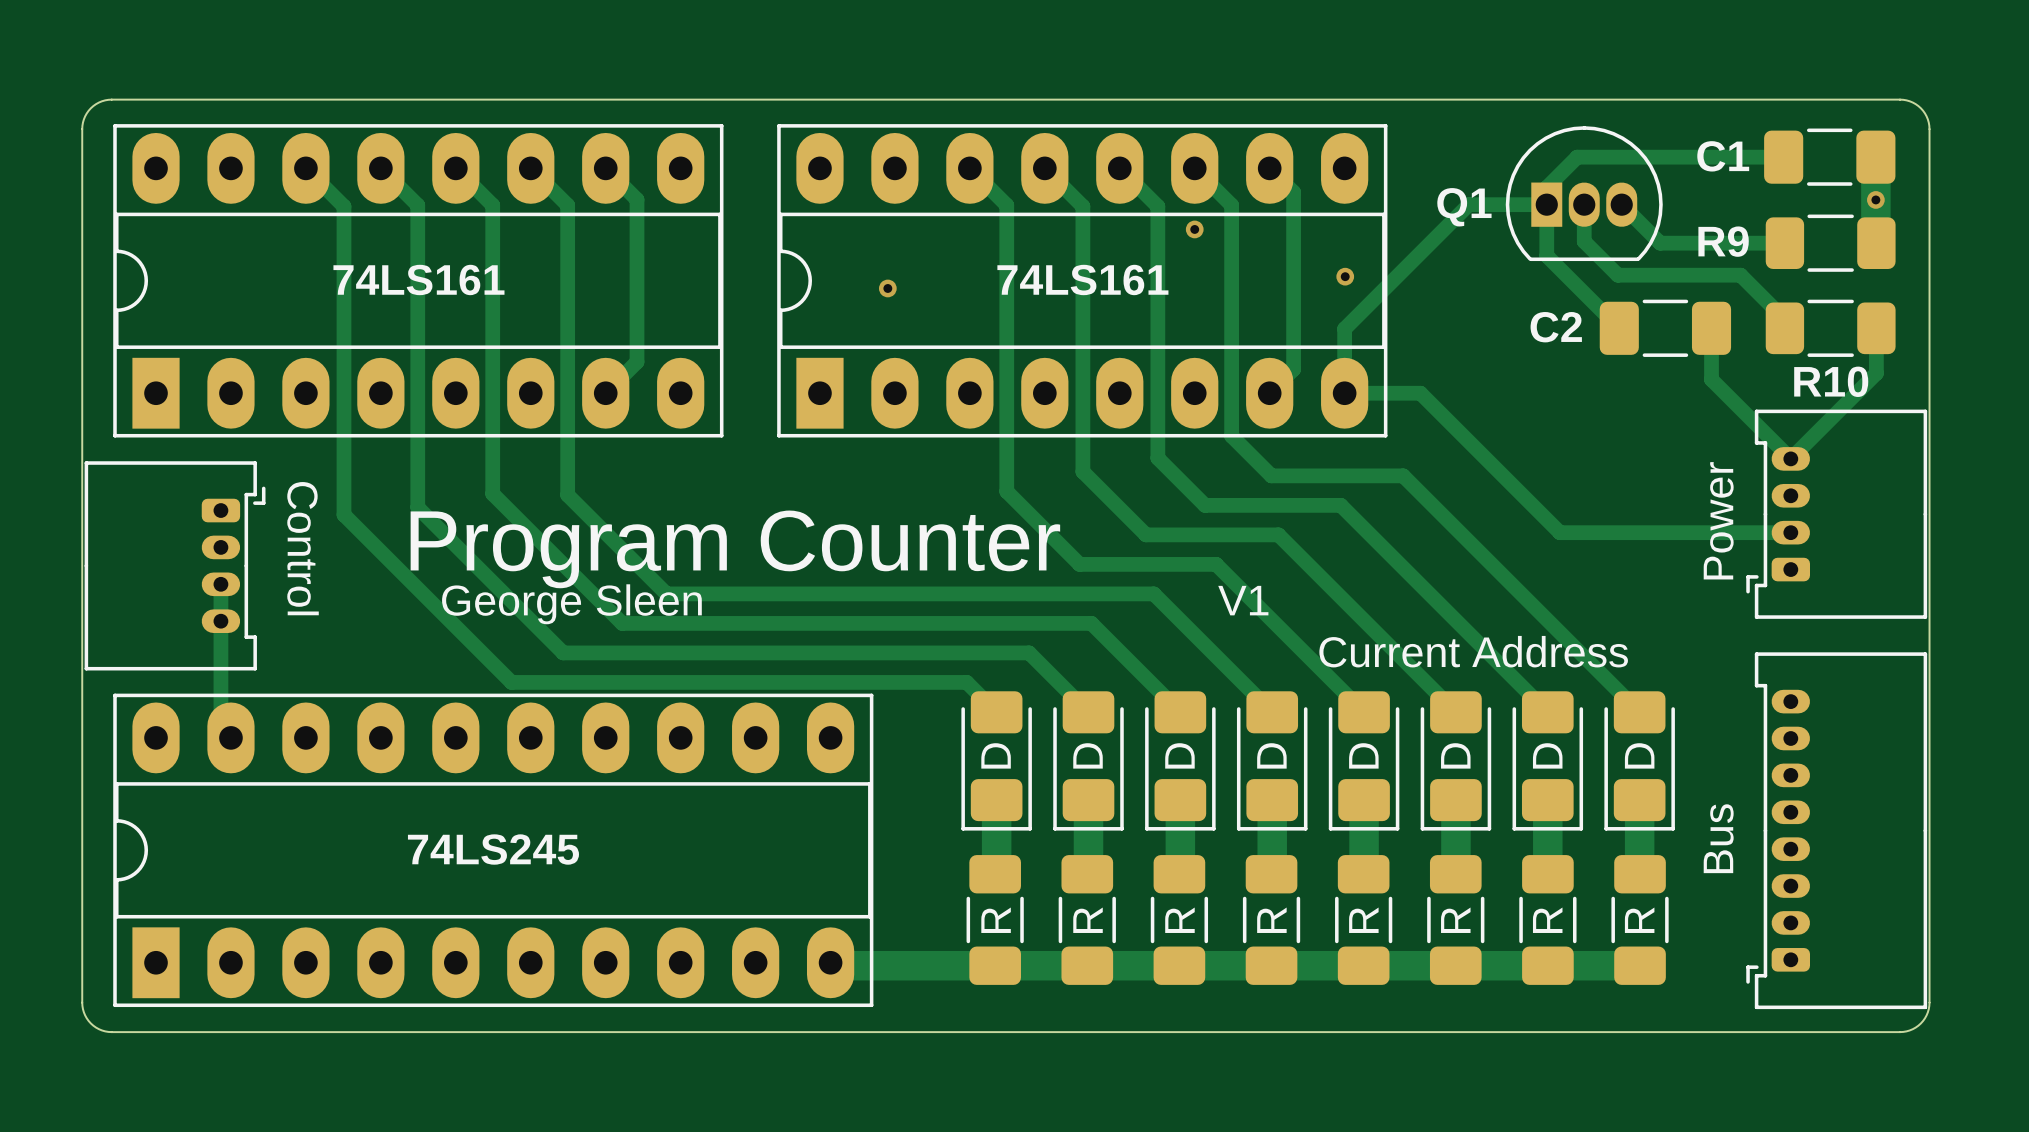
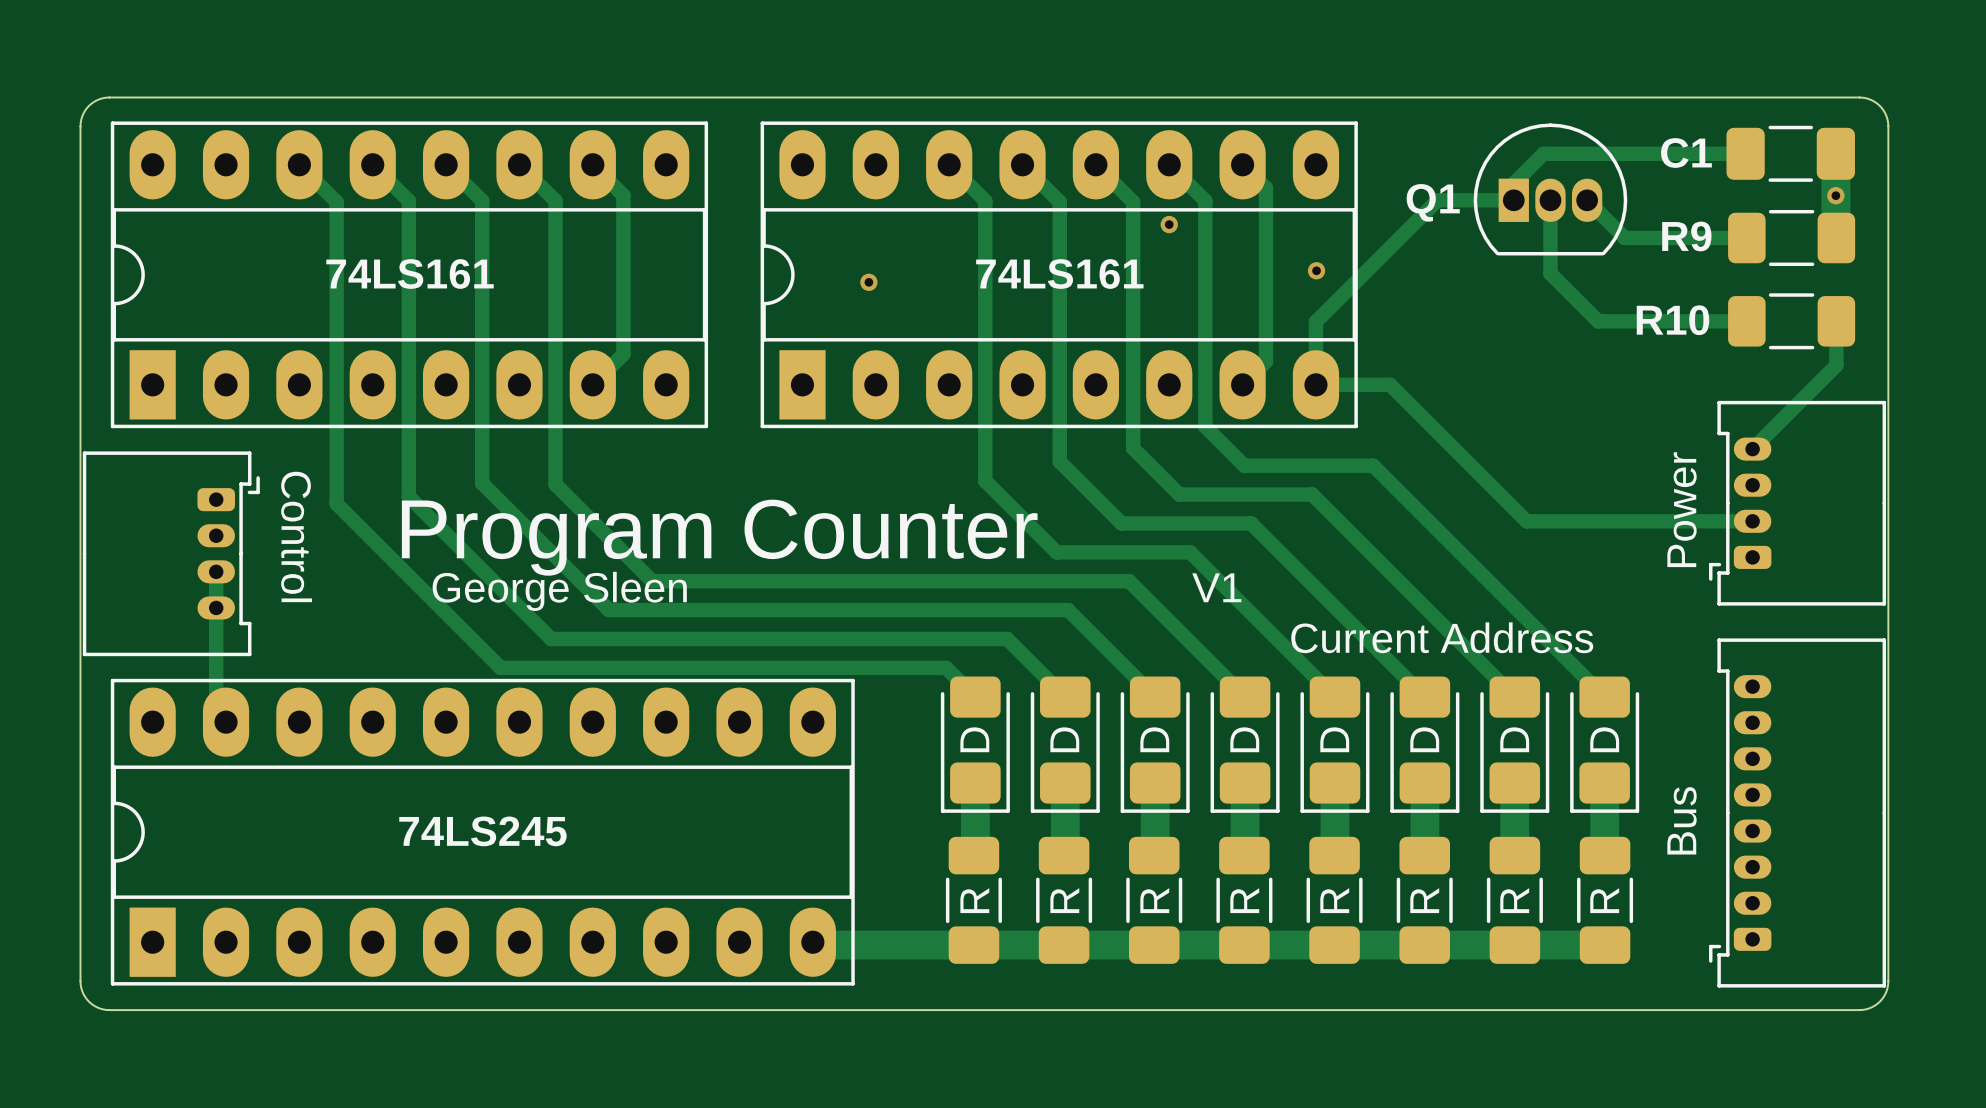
track: (1546, 204) (1546, 255) (1619, 328) -> none
track: (1584, 241) (1617, 275) (1740, 275) (1784, 319) (1784, 328) -> (1550, 236) (1550, 273) (1598, 321) (1746, 321)
text: C2 (1556, 327) -> none
part: (1665, 328) -> none
track: (1711, 328) (1711, 379) (1790, 458) -> none
R10 name position: R10 (1831, 381) -> R10 (1672, 320)

